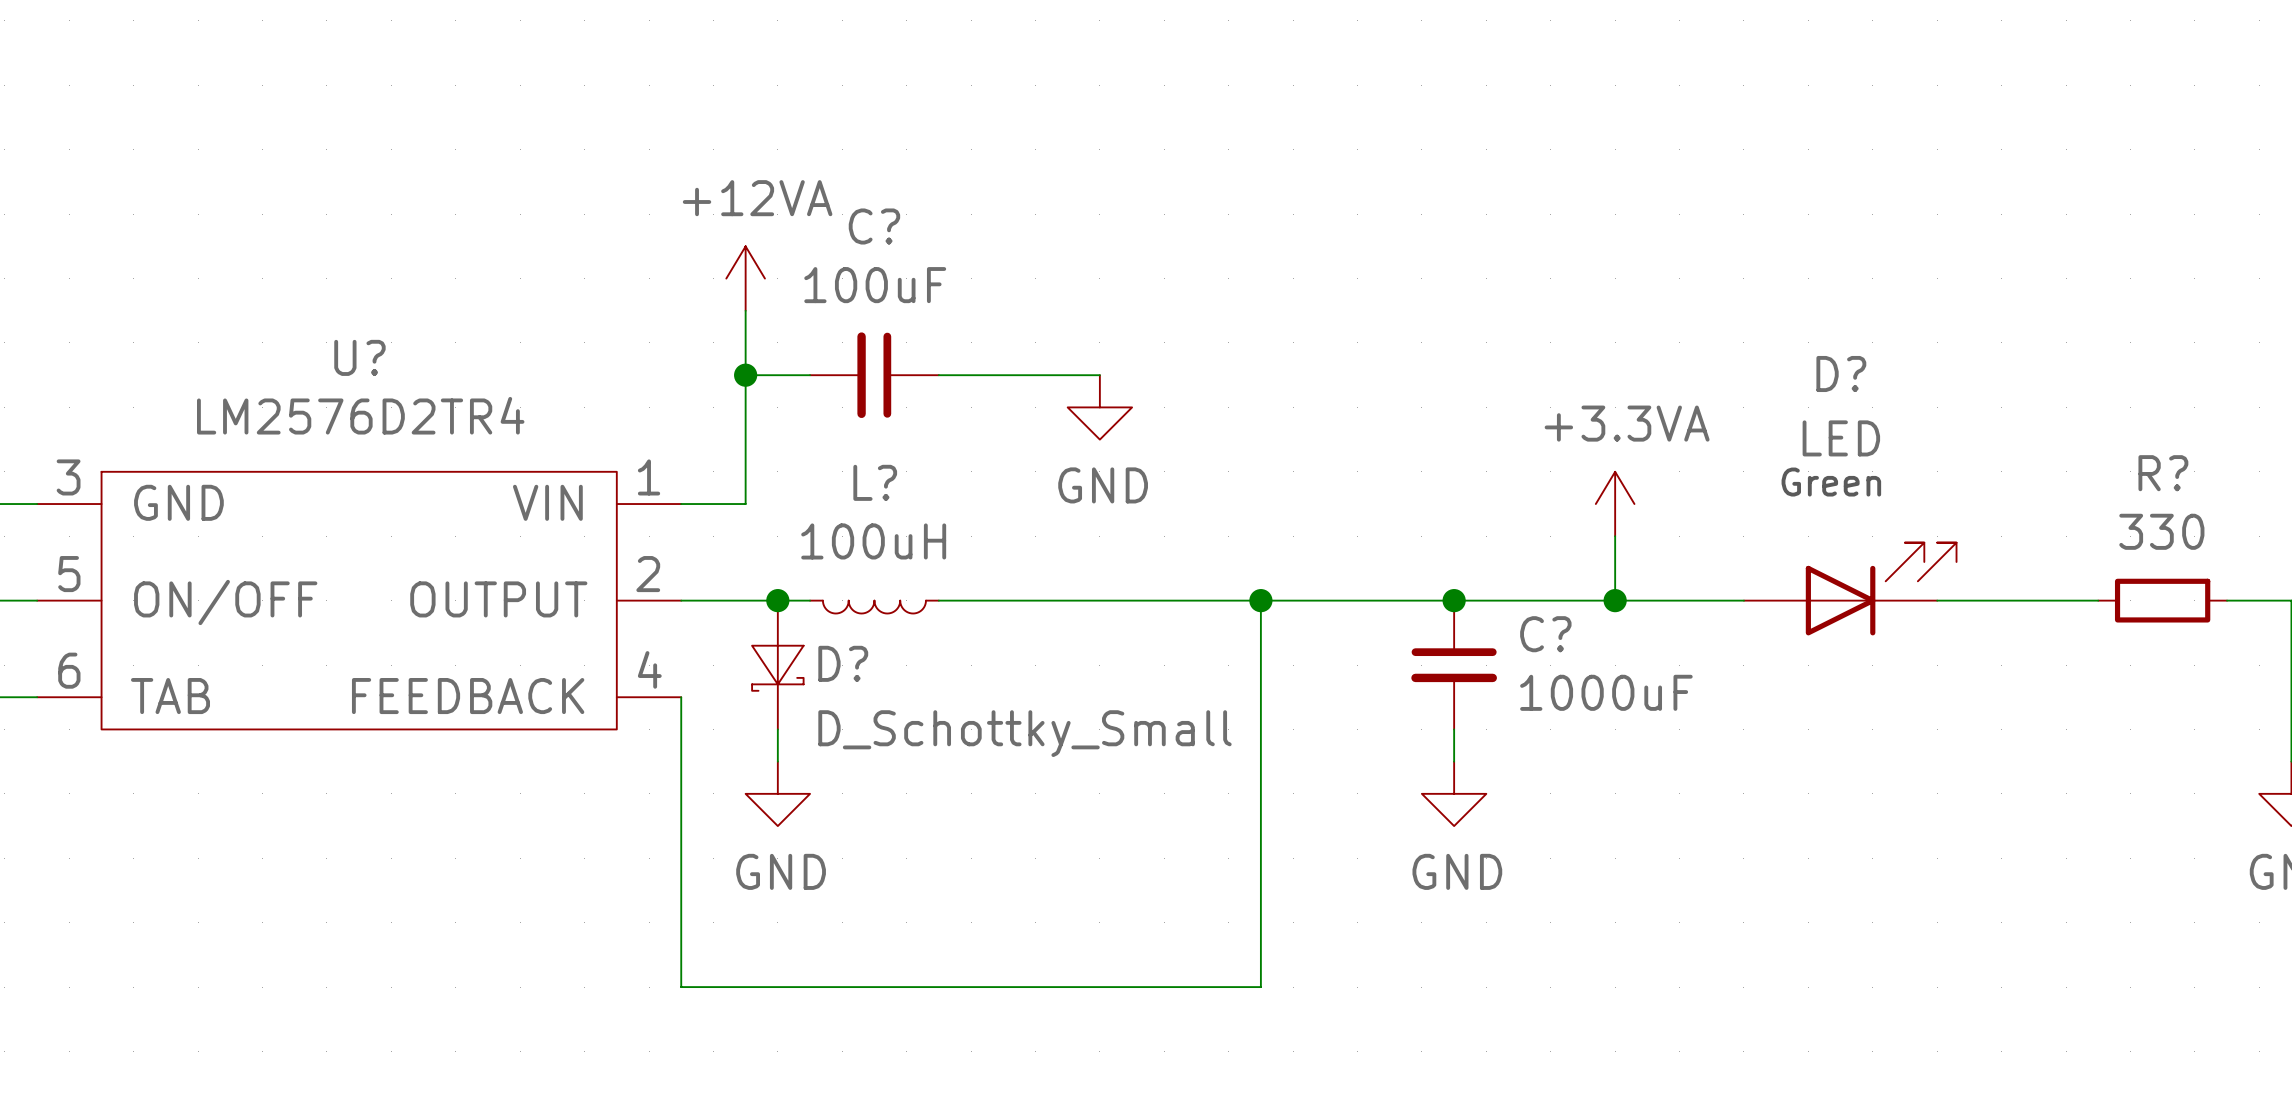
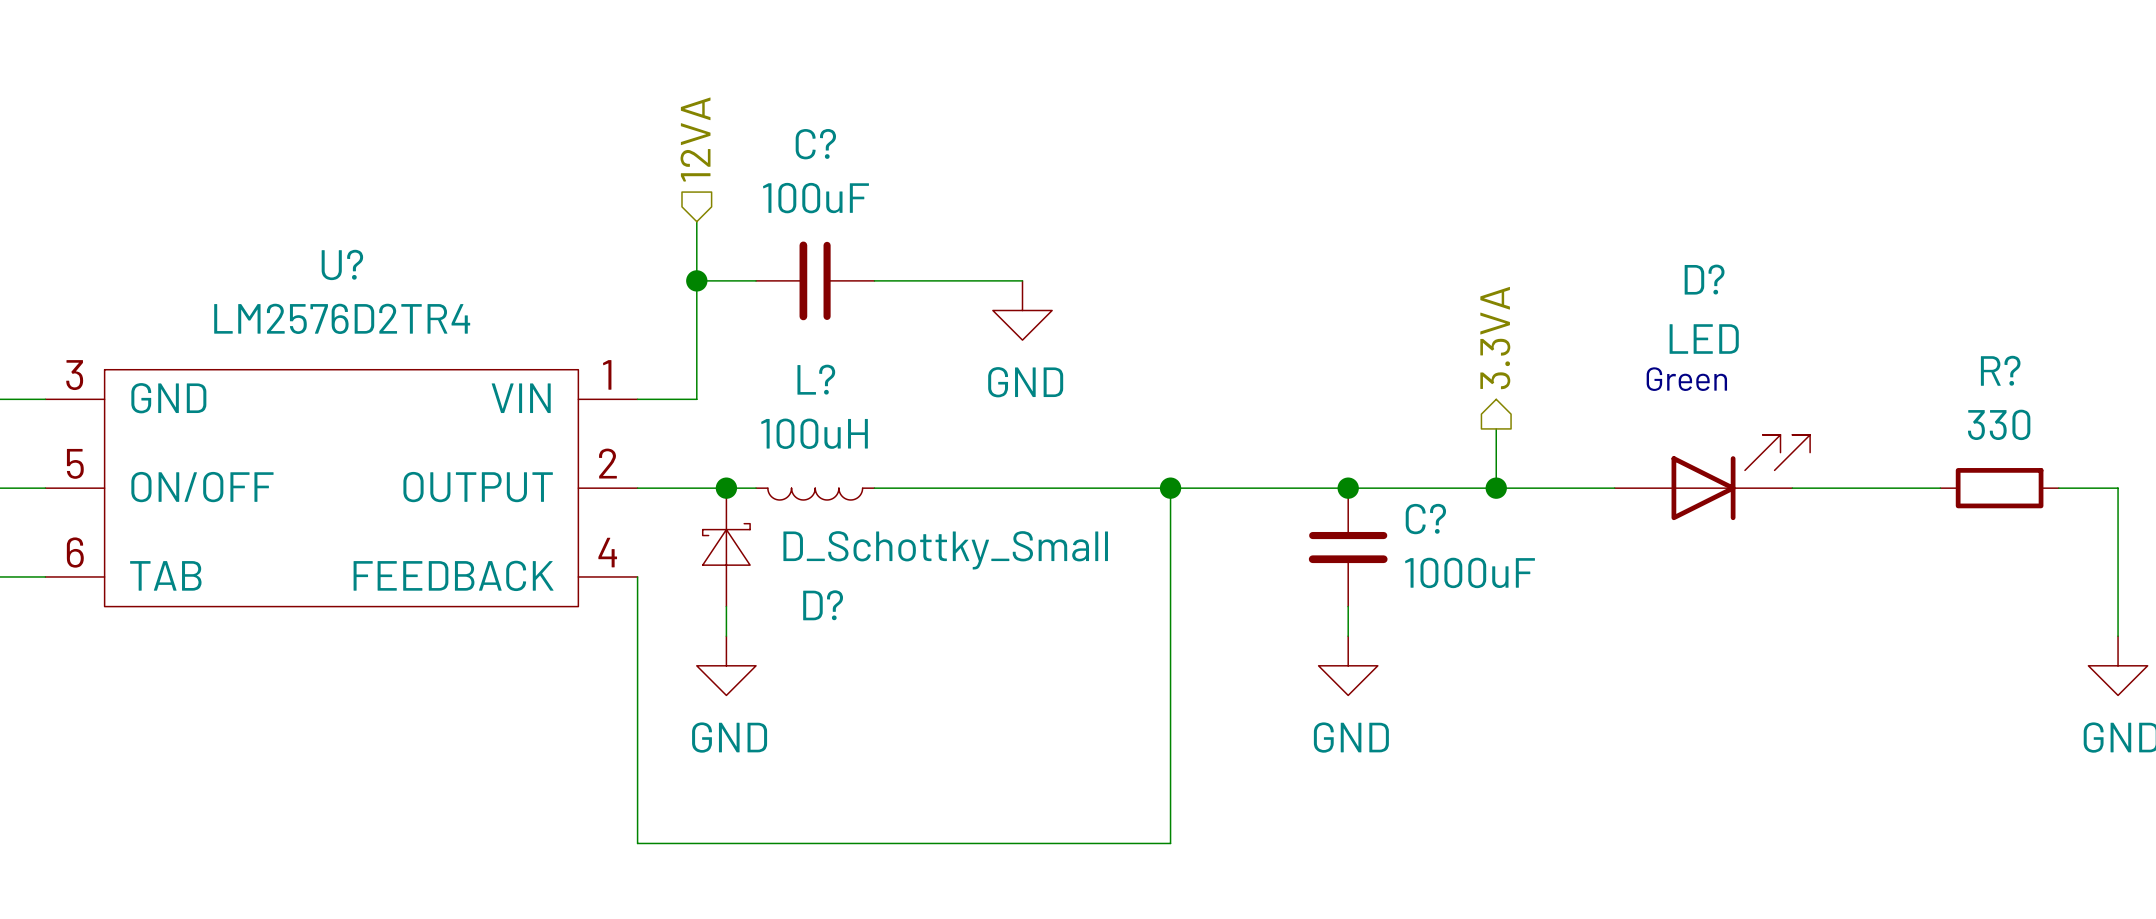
hierarchical label: none -> 12VA (695, 139)
power symbol: +12VA (745, 278) -> none
hierarchical label: none -> 3.3VA (1495, 338)
power symbol: +3.3VA (1615, 504) -> none
D? name position: D? (843, 663) -> D? (823, 605)
D? rotation: 0° (777, 668) -> 180° (726, 544)
D? value position: D_Schottky_Small (1024, 733) -> D_Schottky_Small (945, 550)

